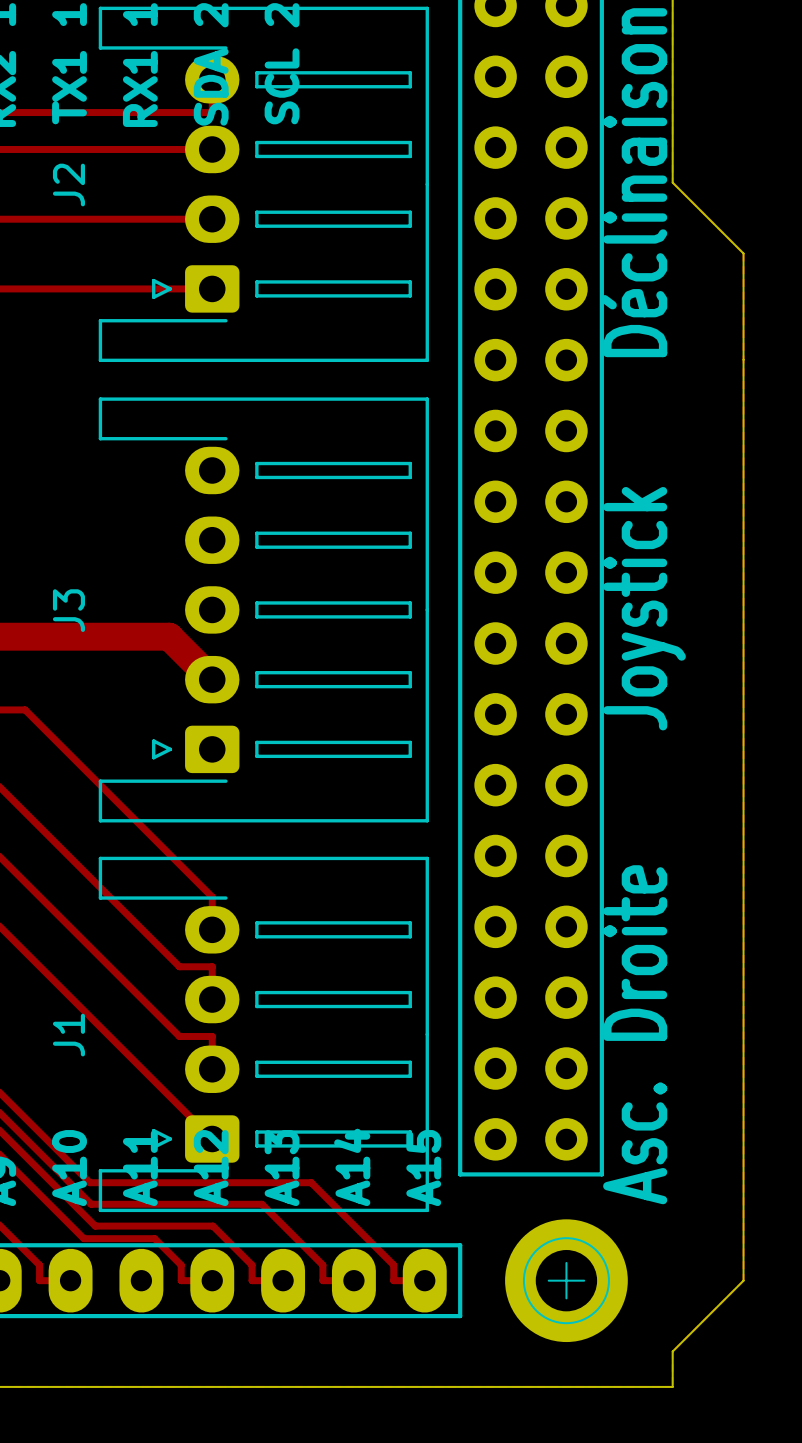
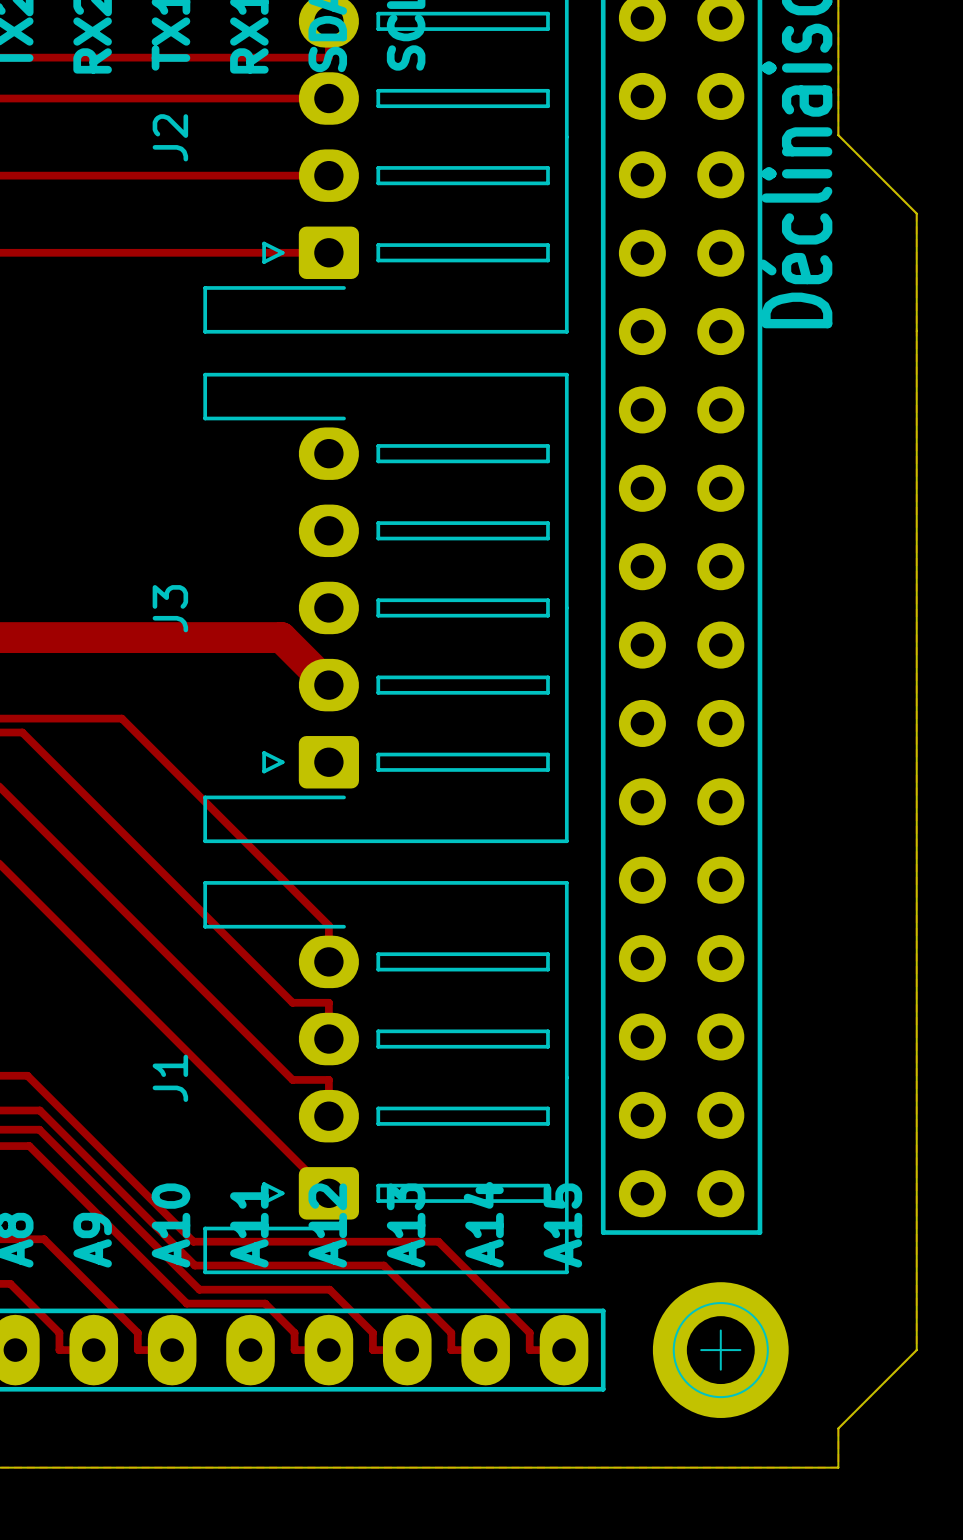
text: Joystick (644, 608) -> none
text: Asc. Droite (635, 1034) -> none

